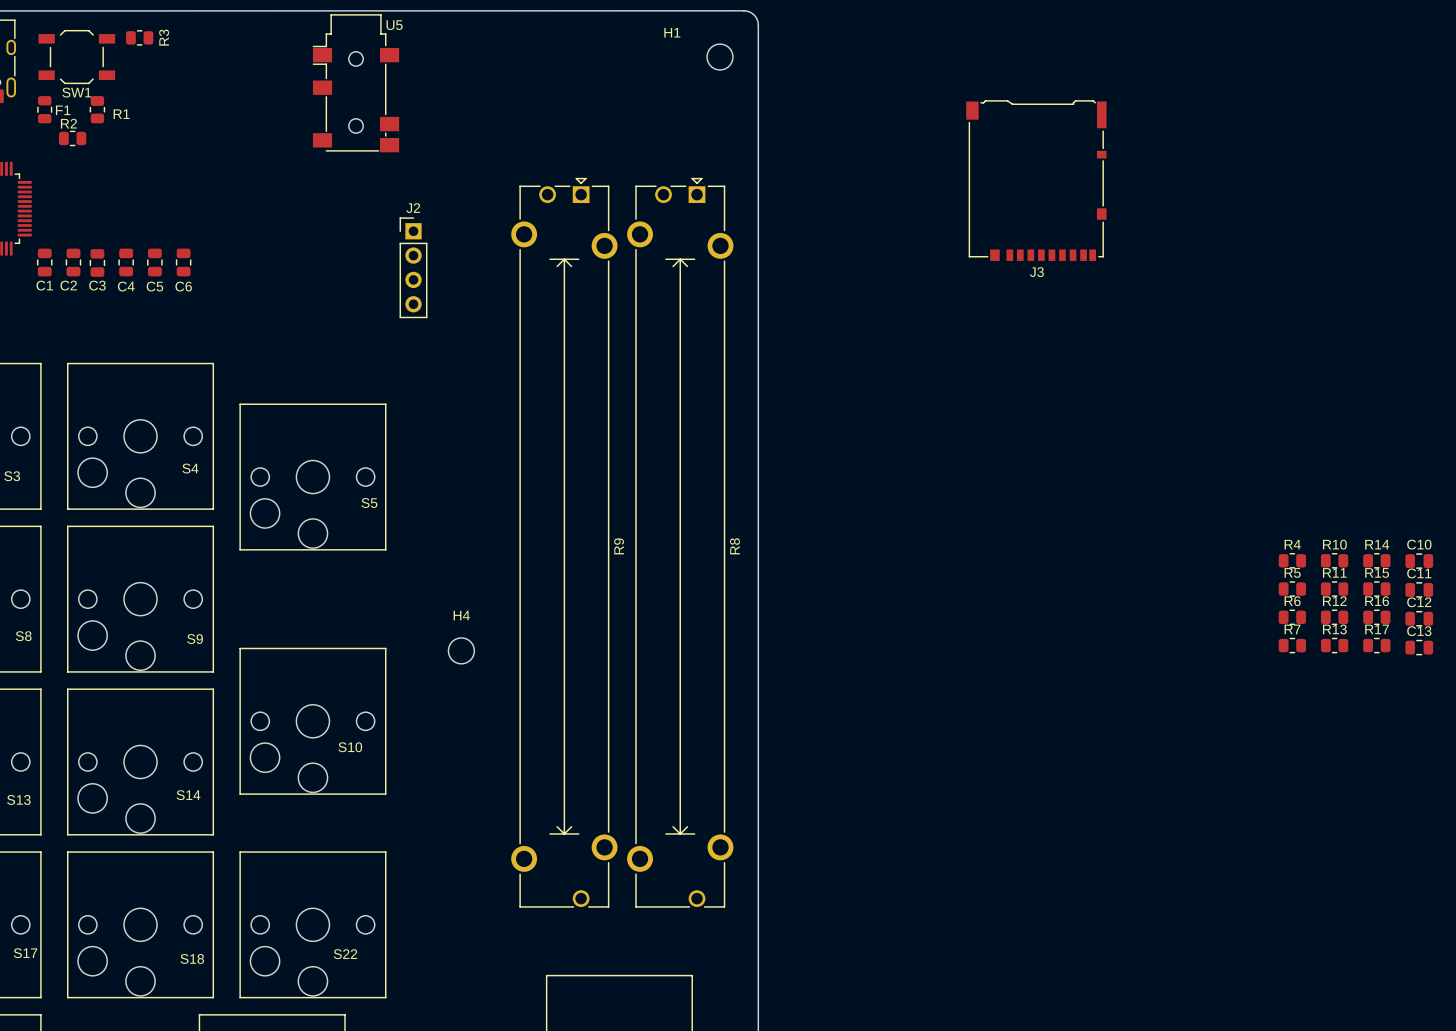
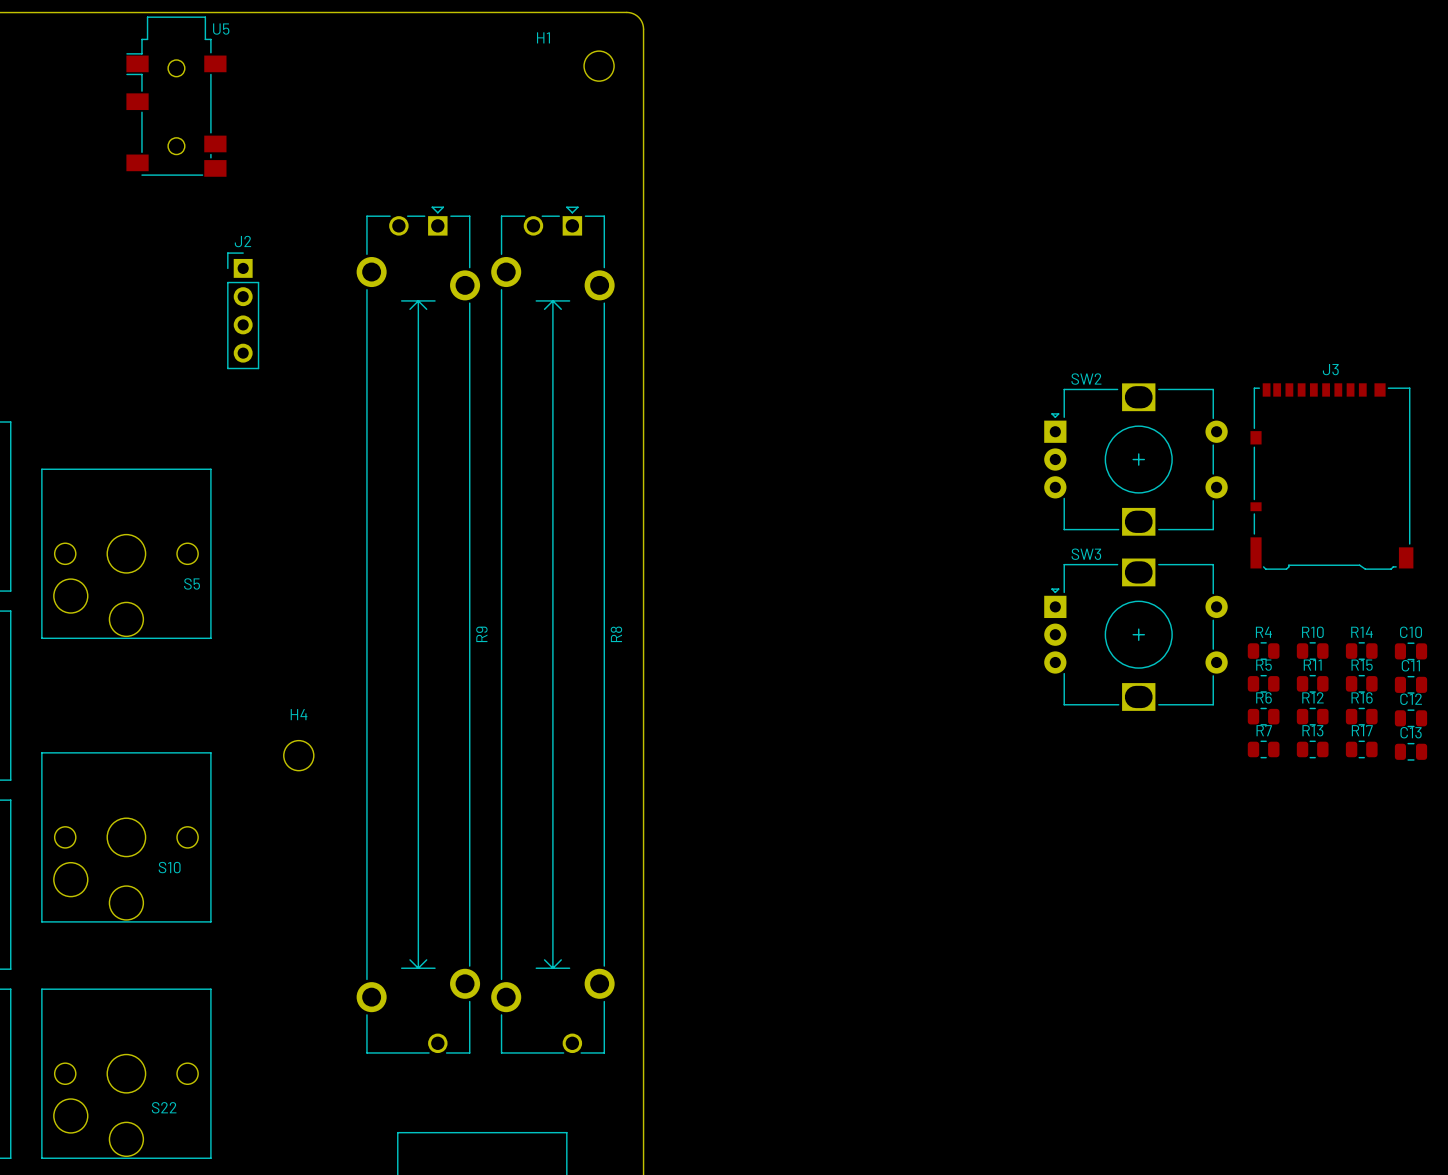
J3 rotation: 0° (1036, 180) -> 180° (1331, 476)
J3 position: (1036, 180) -> (1331, 476)
SW2: none -> (1135, 459)
SW3: none -> (1135, 634)

